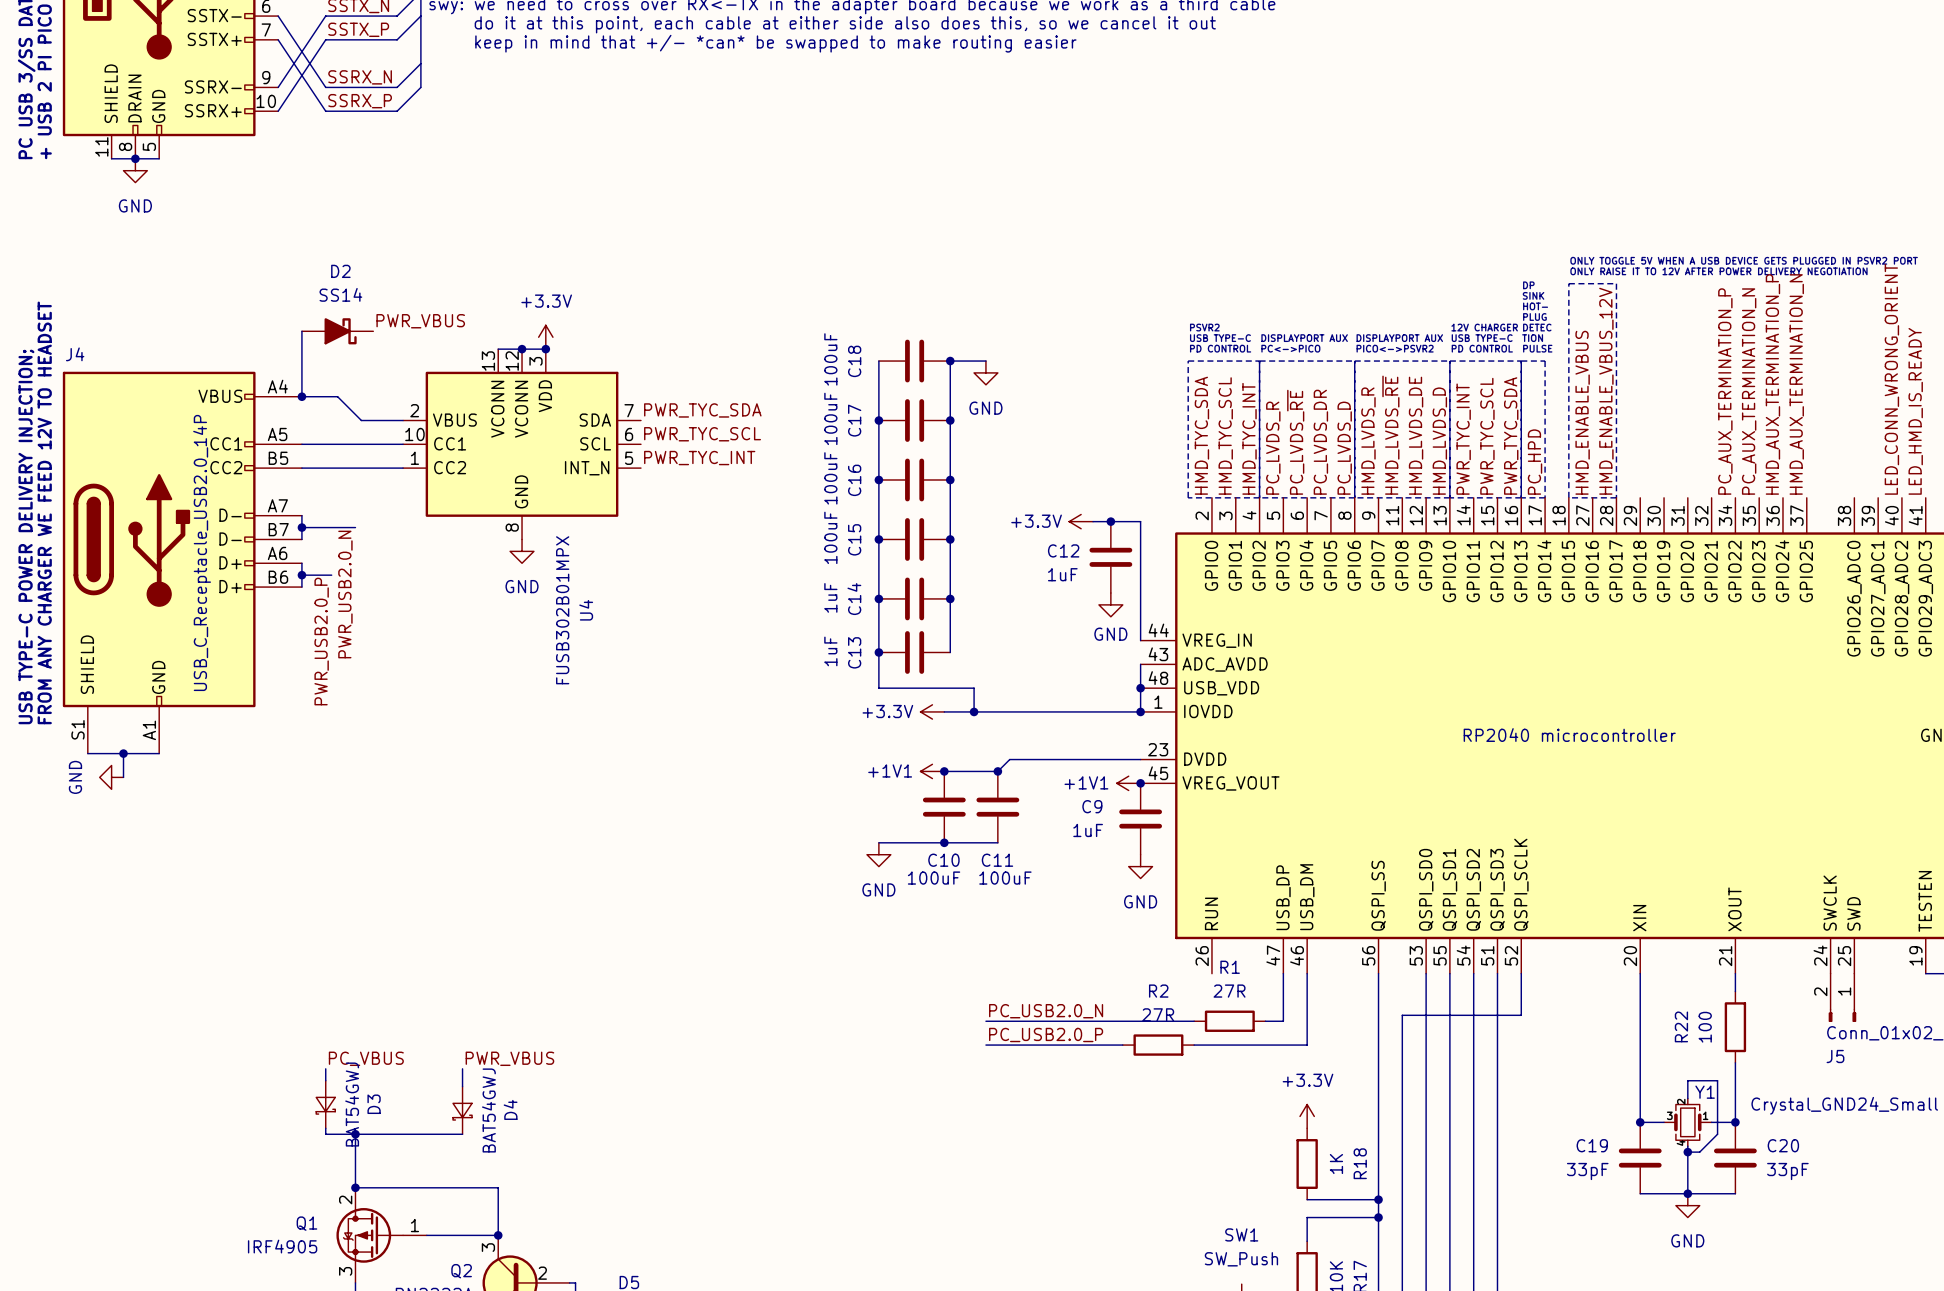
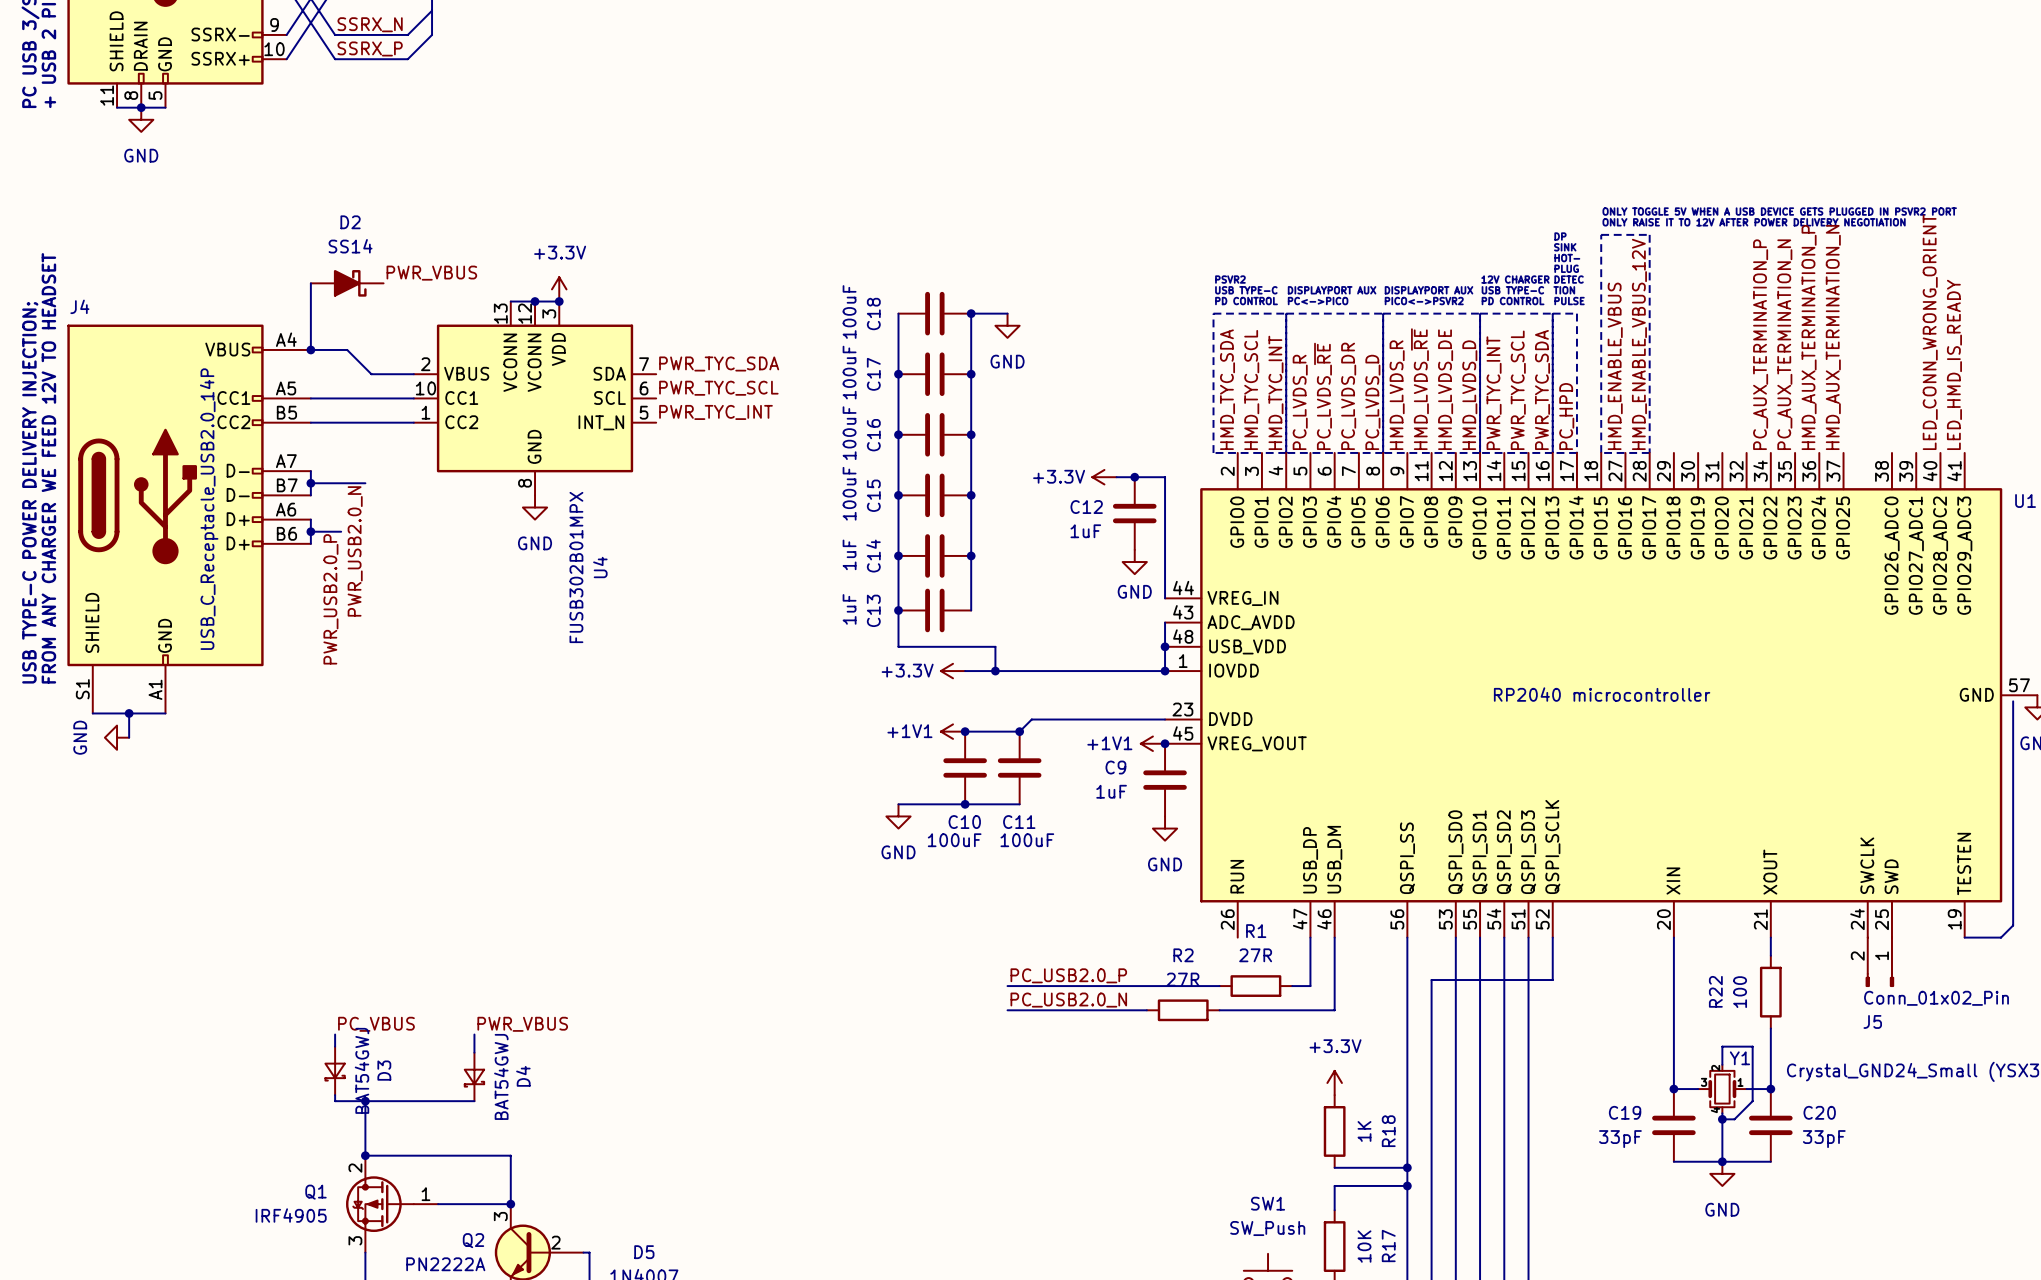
label: PC_USB2.0_N (1046, 1011) -> PC_USB2.0_P (1068, 975)
label: PC_USB2.0_P (1046, 1035) -> PC_USB2.0_N (1068, 1000)

